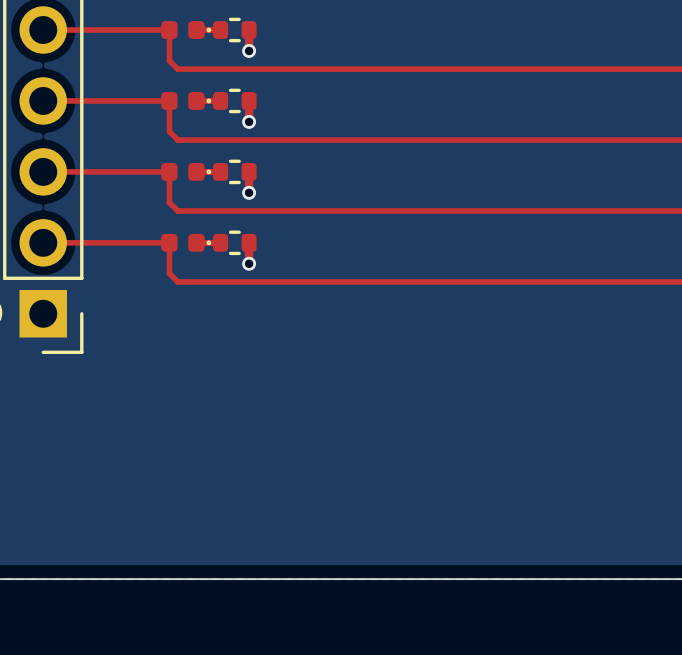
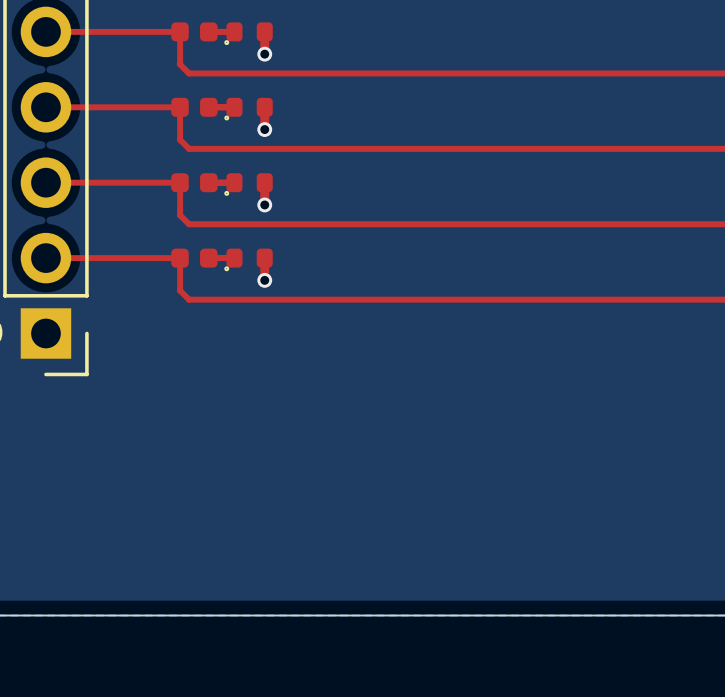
part footprint: [213, 17, 257, 43] -> [226, 22, 273, 42]
part footprint: [161, 21, 211, 39] -> [171, 22, 229, 45]
part footprint: [213, 88, 257, 114] -> [226, 97, 273, 117]
part footprint: [161, 92, 211, 110] -> [171, 97, 229, 121]
part footprint: [213, 159, 257, 185] -> [226, 173, 273, 193]
part footprint: [161, 162, 211, 181] -> [171, 173, 229, 196]
part footprint: [213, 230, 257, 256] -> [226, 248, 273, 268]
part footprint: [161, 233, 211, 252] -> [171, 248, 229, 272]

